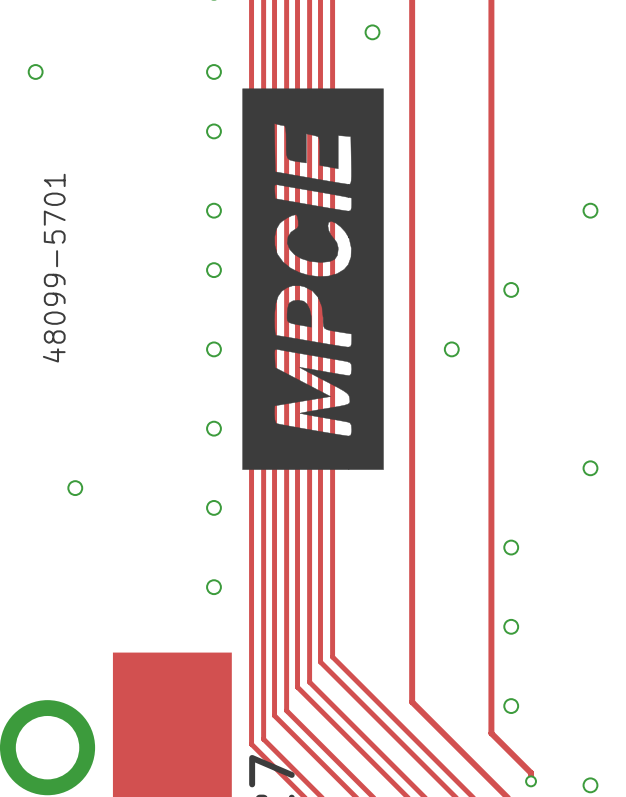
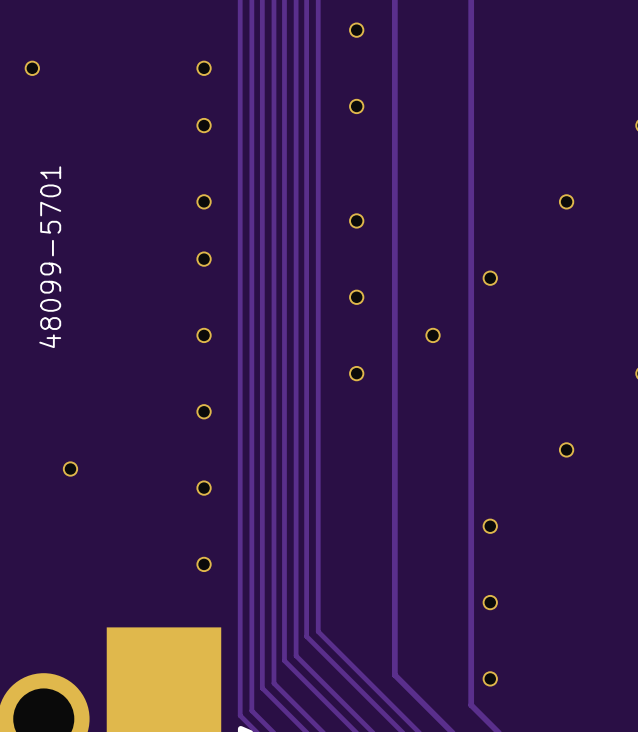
drawing: [242, 88, 384, 470] -> none

